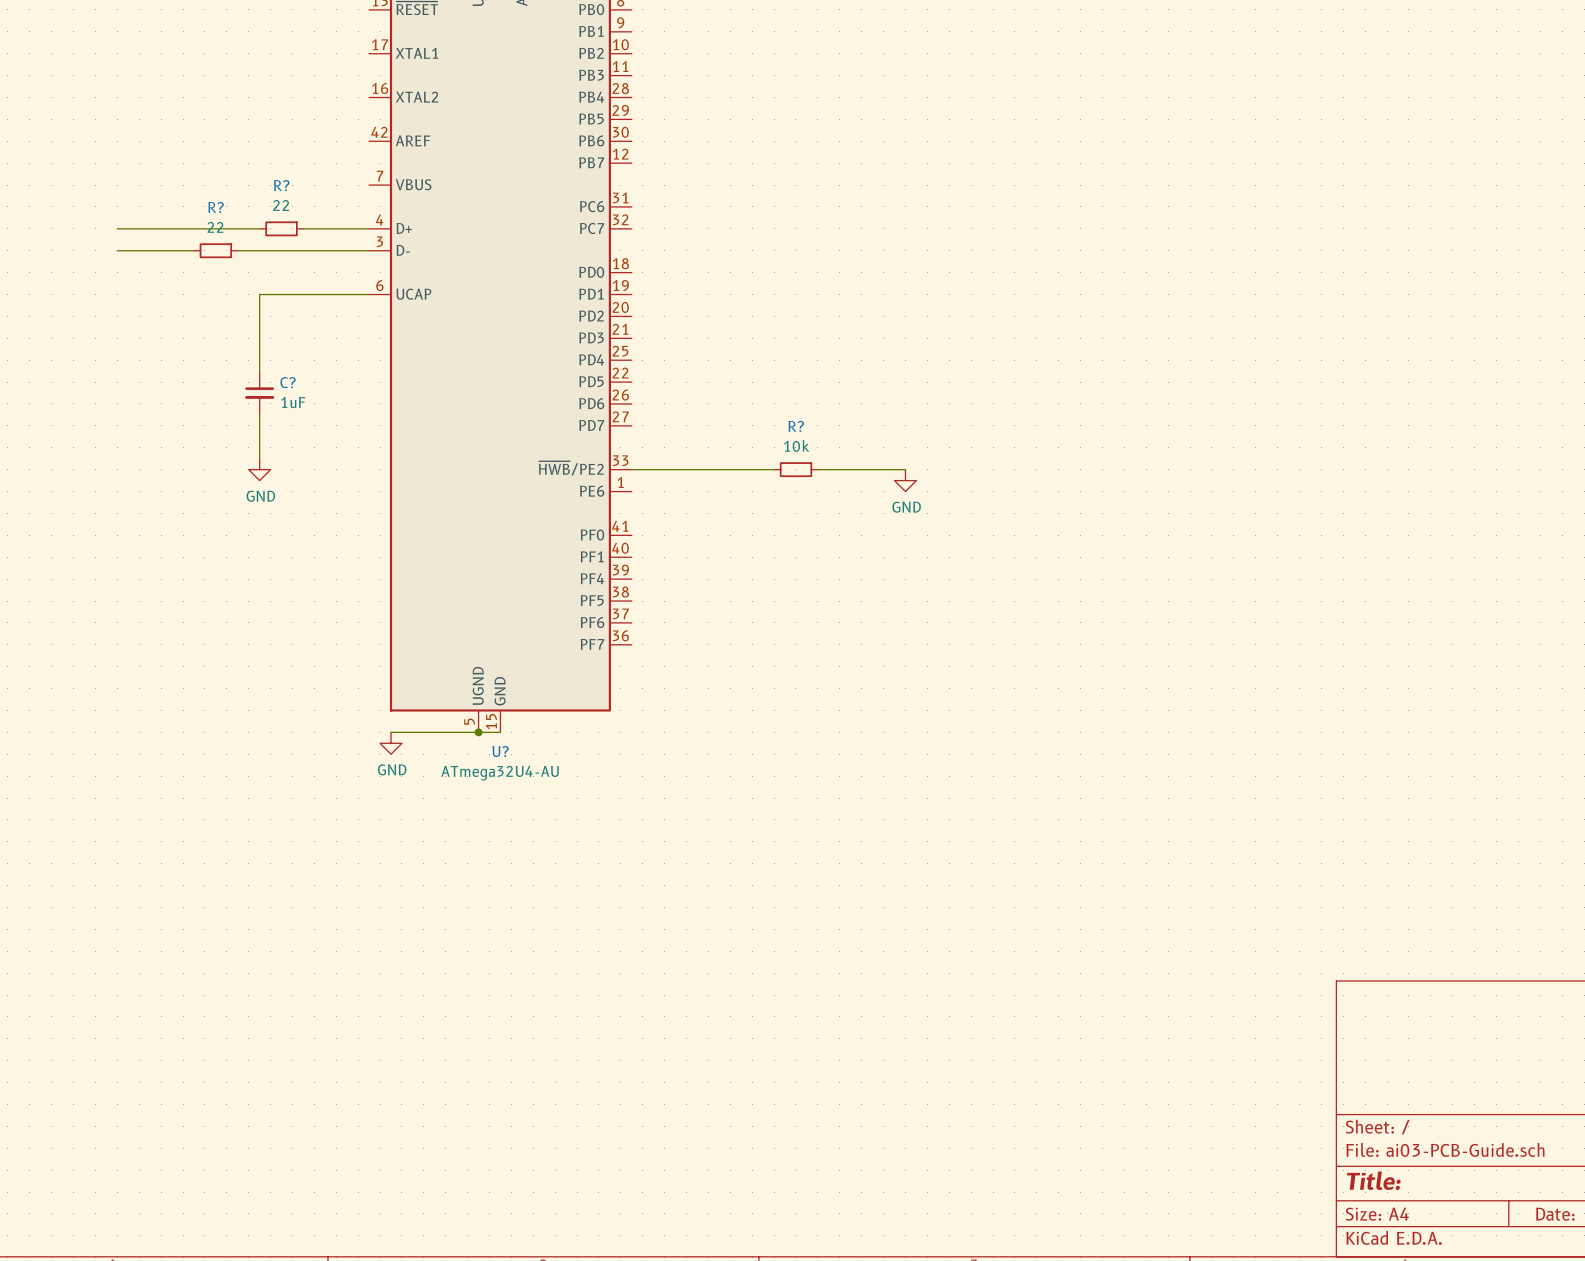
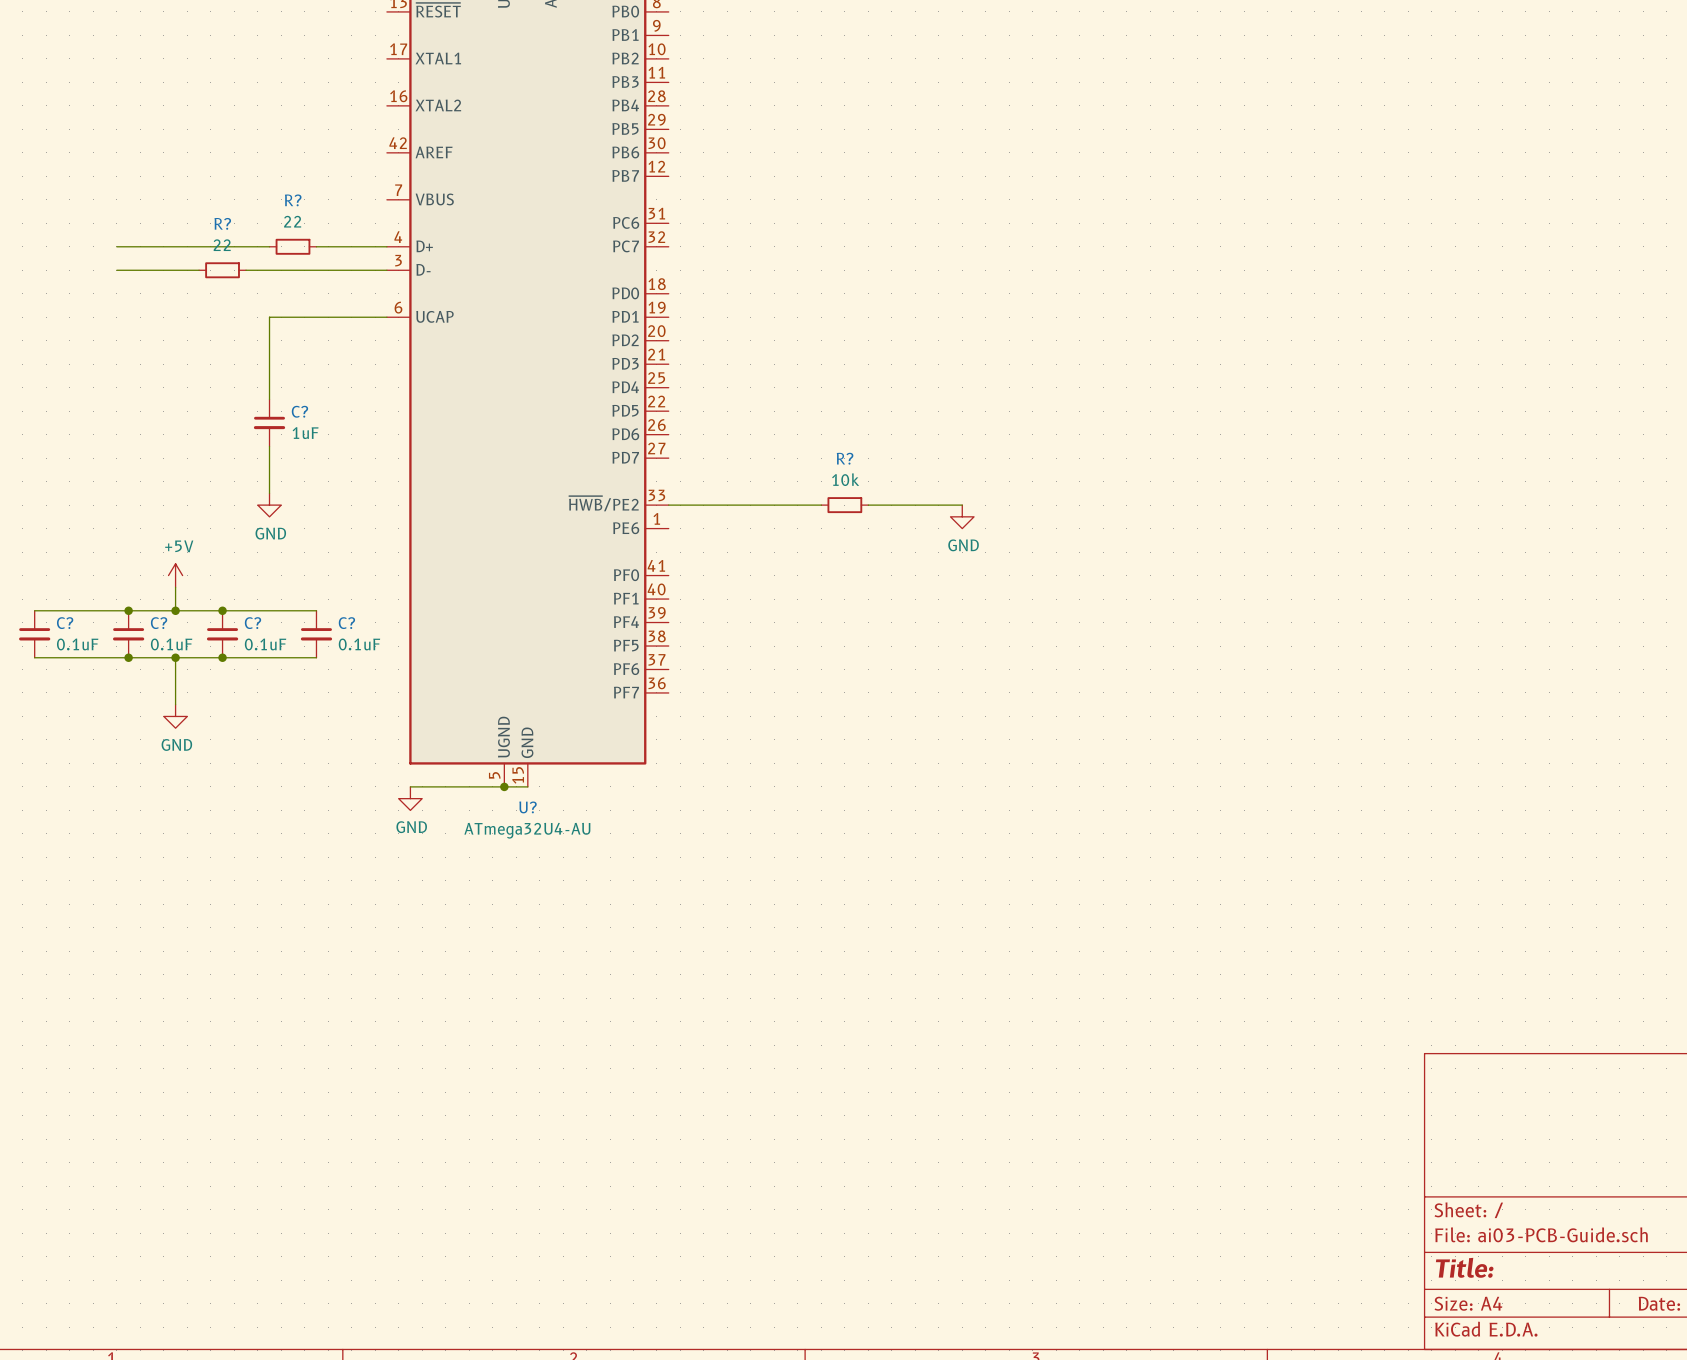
power symbol: none -> +5V (175, 575)
wire: none -> (175, 587) (175, 610)
wire: none -> (34, 610) (316, 610)
junction: none -> (128, 610)
junction: none -> (175, 610)
junction: none -> (222, 610)
C?: none -> 0.1uF (34, 634)
C?: none -> 0.1uF (128, 634)
C?: none -> 0.1uF (222, 634)
C?: none -> 0.1uF (316, 634)
wire: none -> (34, 657) (316, 657)
junction: none -> (128, 657)
wire: none -> (175, 657) (175, 704)
junction: none -> (175, 657)
junction: none -> (222, 657)
power symbol: none -> GND (175, 716)

